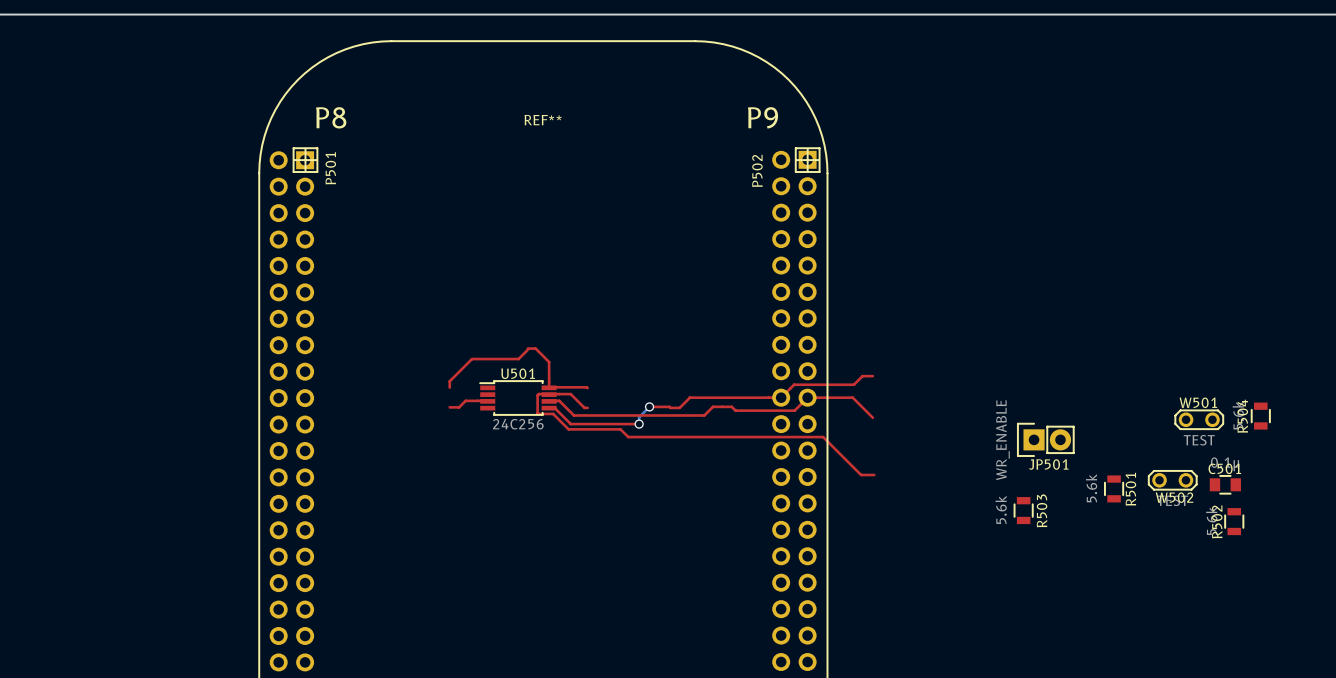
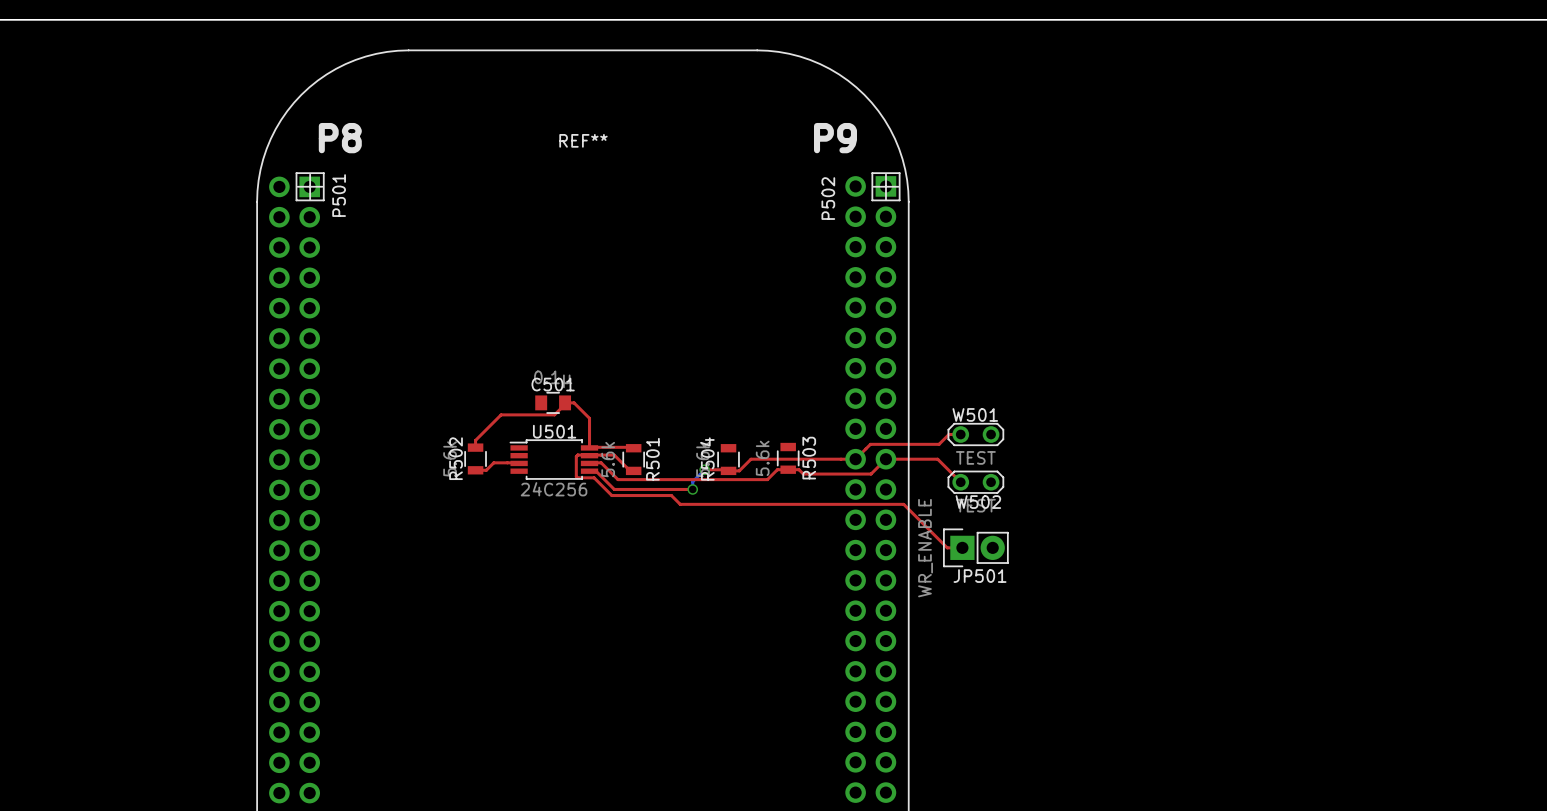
R504 position: (1260, 416) -> (728, 459)
W501 position: (1199, 419) -> (975, 434)
JP501 position: (1045, 439) -> (975, 547)
W502 position: (1172, 480) -> (975, 482)
C501 position: (1225, 484) -> (553, 402)
R501 position: (1114, 488) -> (633, 459)
R503 position: (1023, 510) -> (788, 458)
R502 position: (1234, 521) -> (475, 458)

